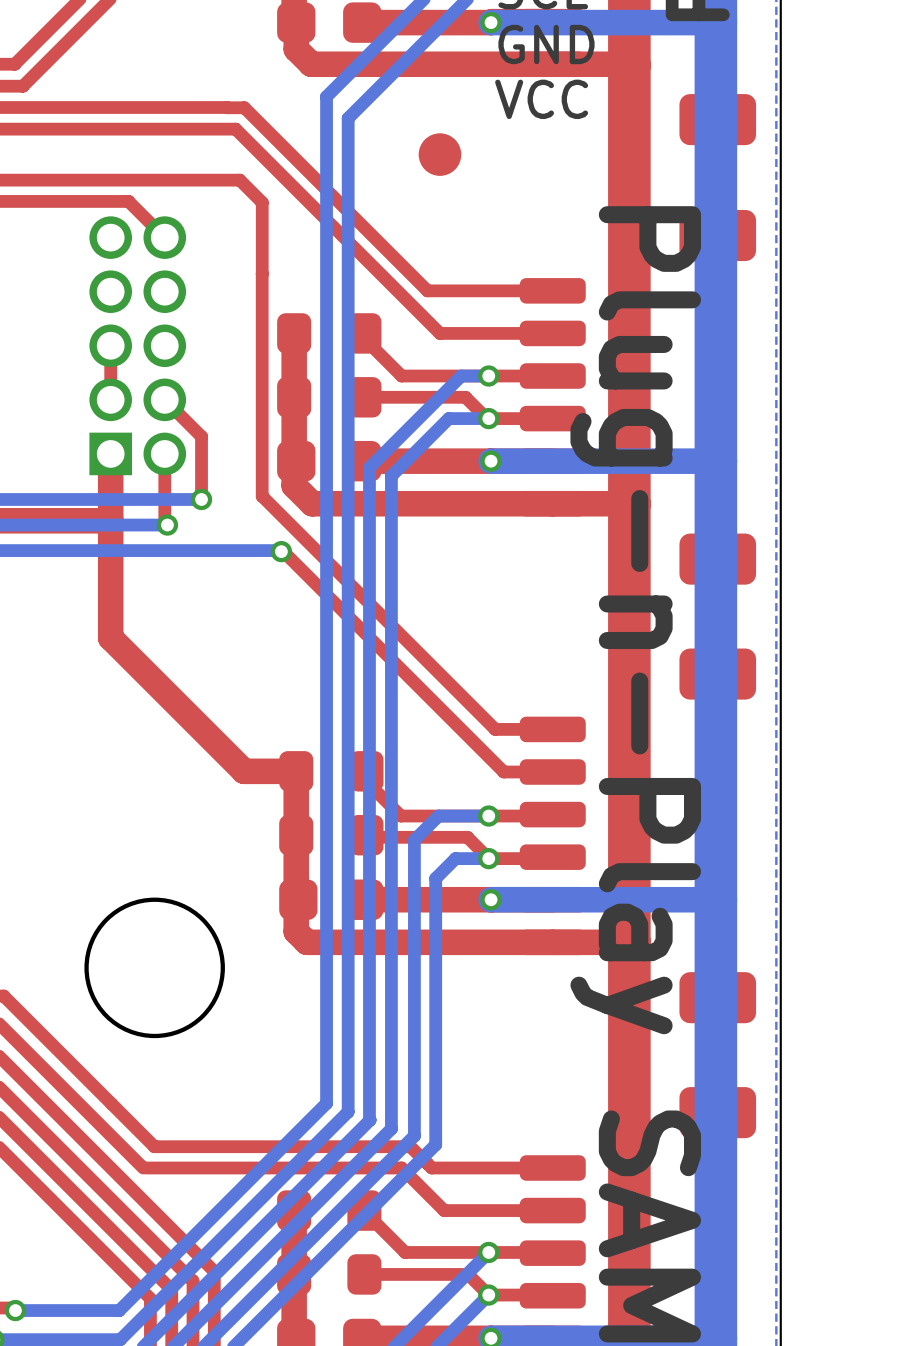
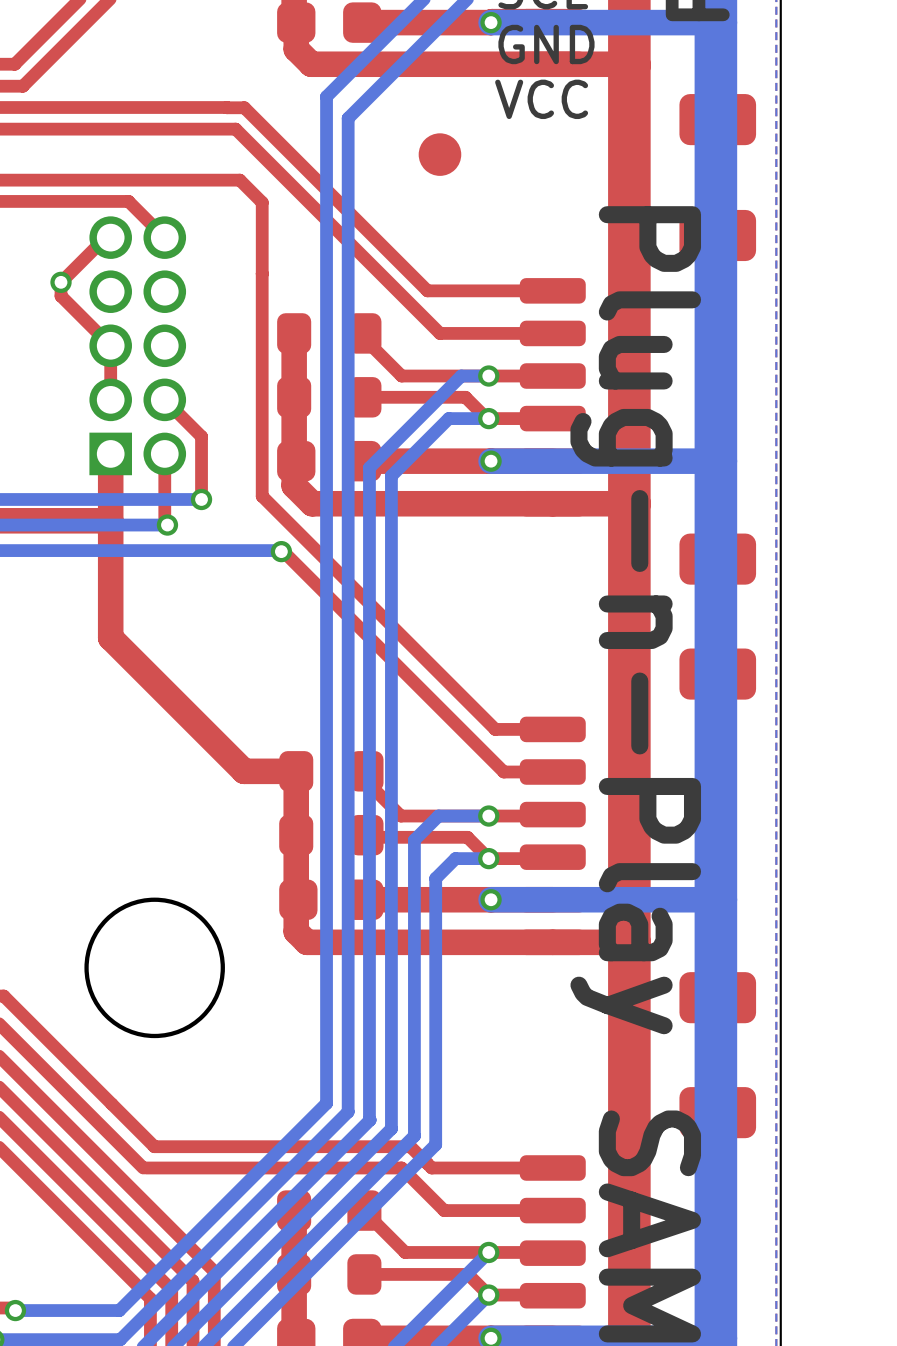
top track: none -> (105, 237) (61, 282) (61, 296) (110, 345)
via: none -> (61, 282)

